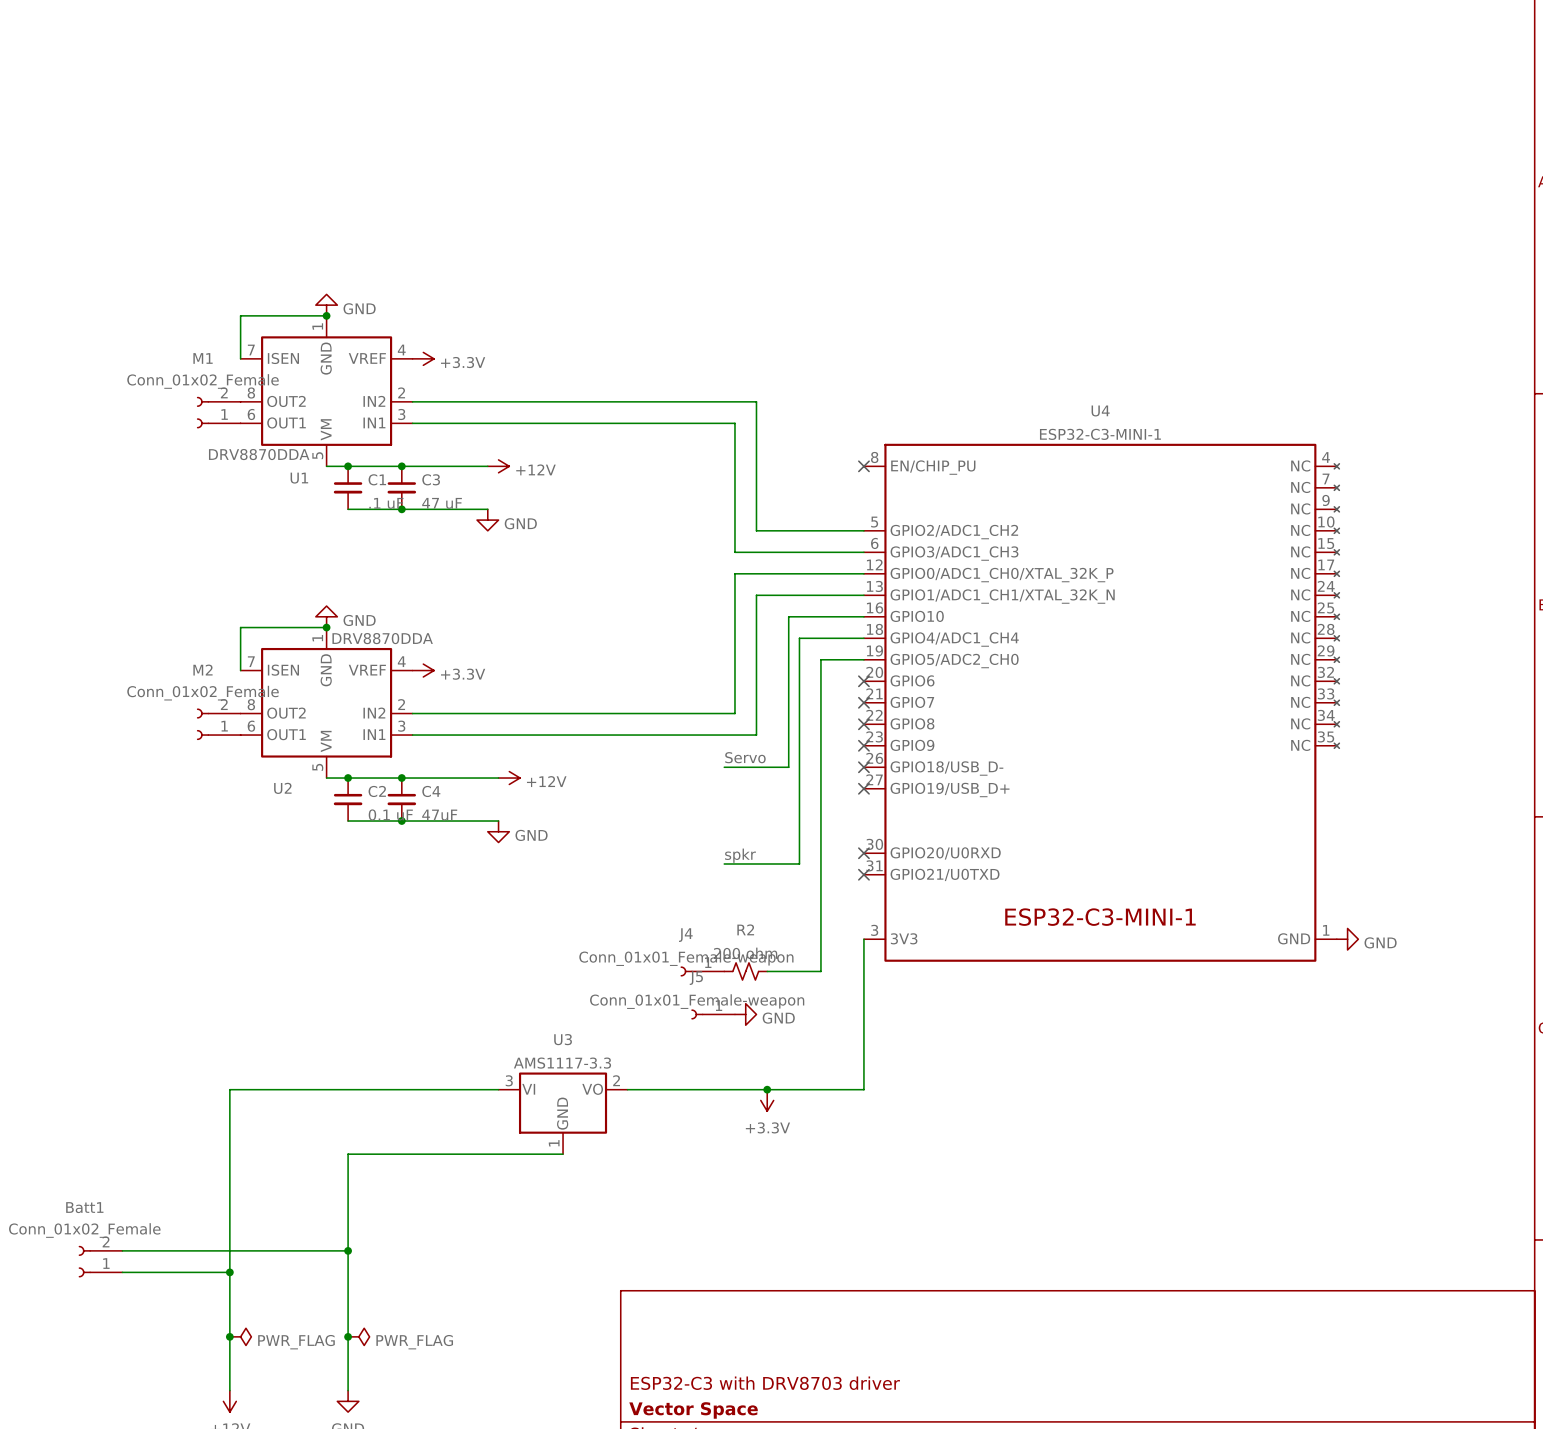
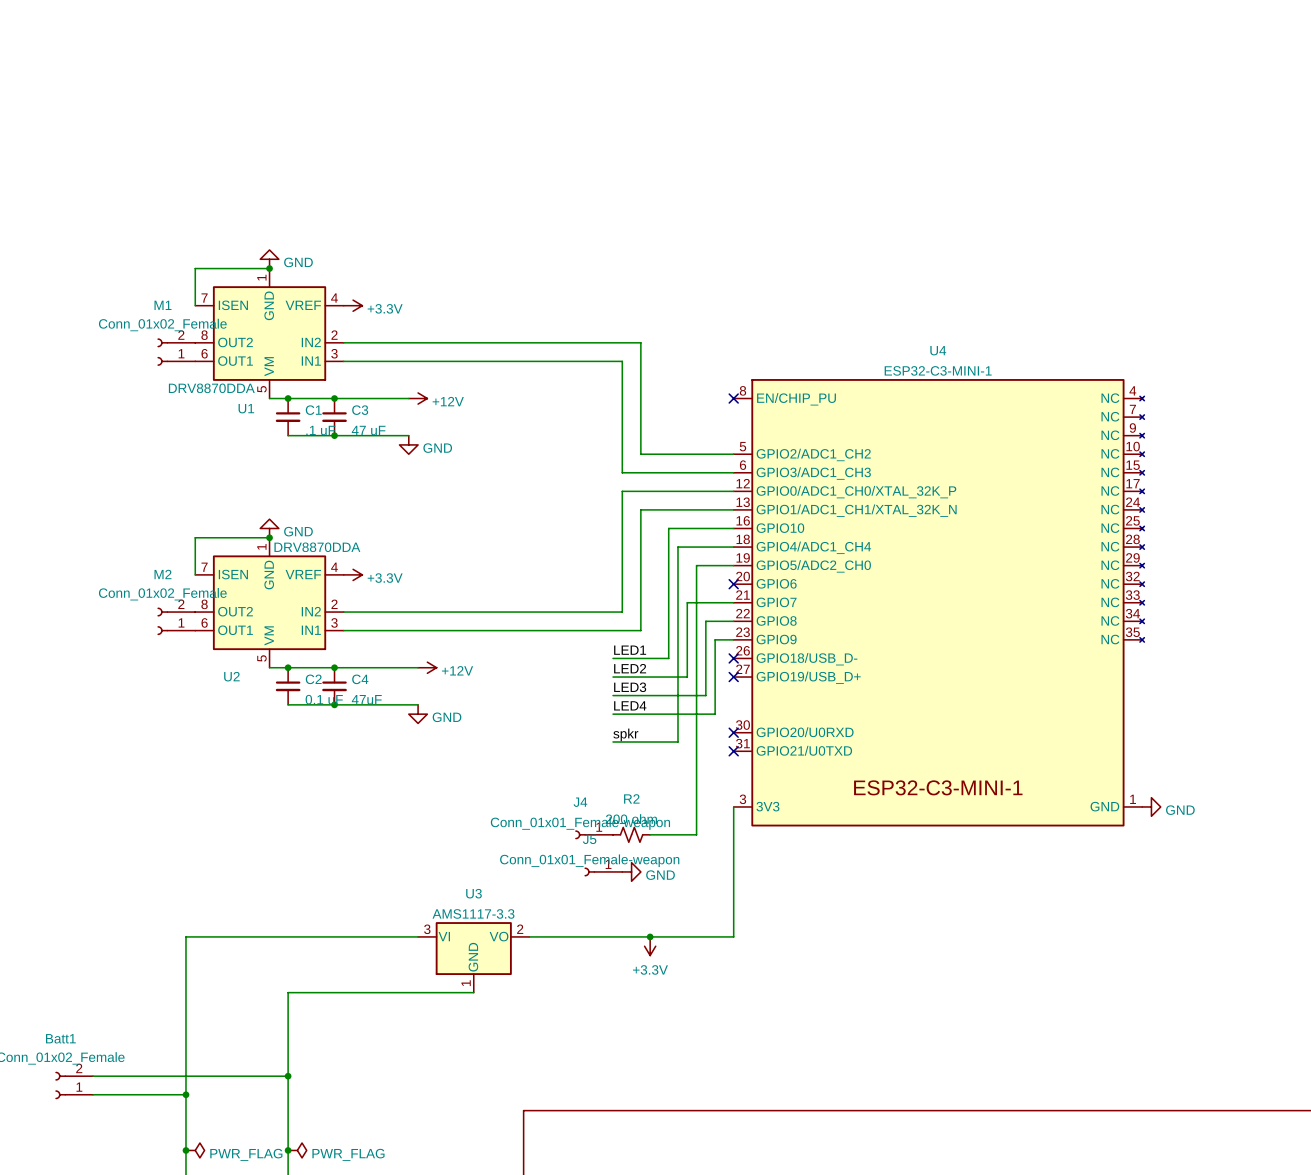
wire: none -> (733, 602) (687, 602) (687, 677) (613, 677)
no-connect mark: (863, 702) -> none
wire: none -> (733, 621) (705, 621) (705, 695) (613, 695)
no-connect mark: (863, 724) -> none
wire: none -> (733, 639) (715, 639) (715, 714) (613, 714)
no-connect mark: (863, 745) -> none
label: Servo (745, 757) -> LED1 (630, 650)
label: none -> LED2 (630, 668)
label: none -> LED3 (630, 687)
label: none -> LED4 (630, 705)

